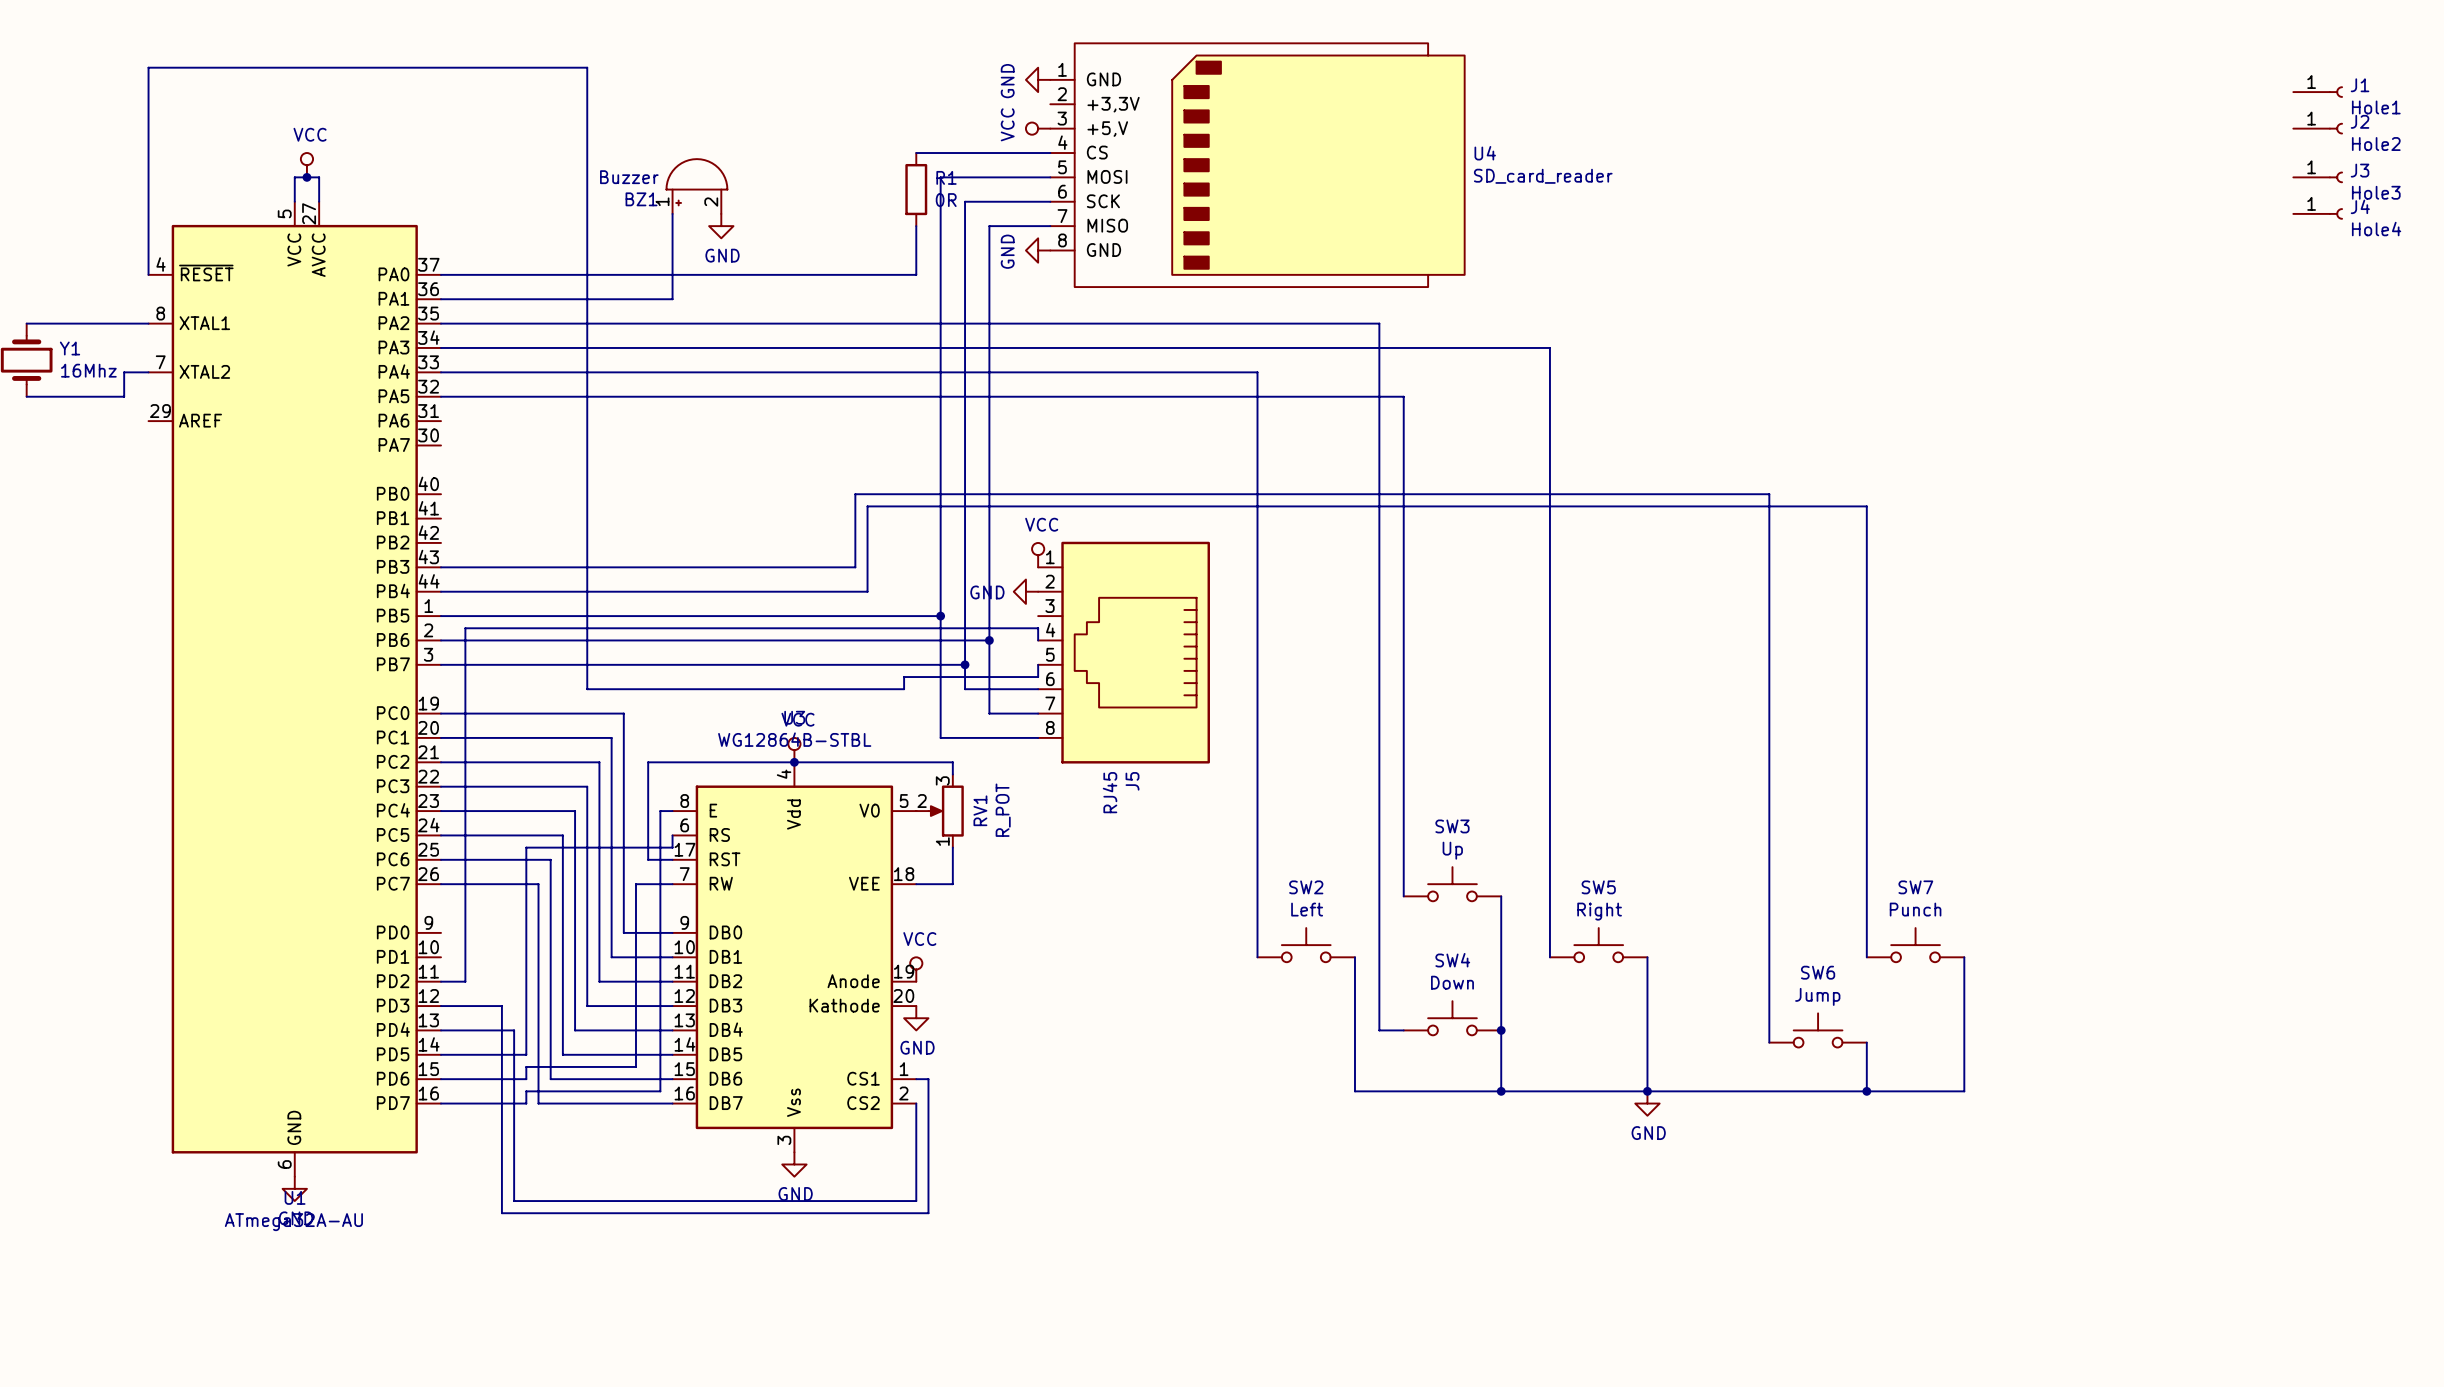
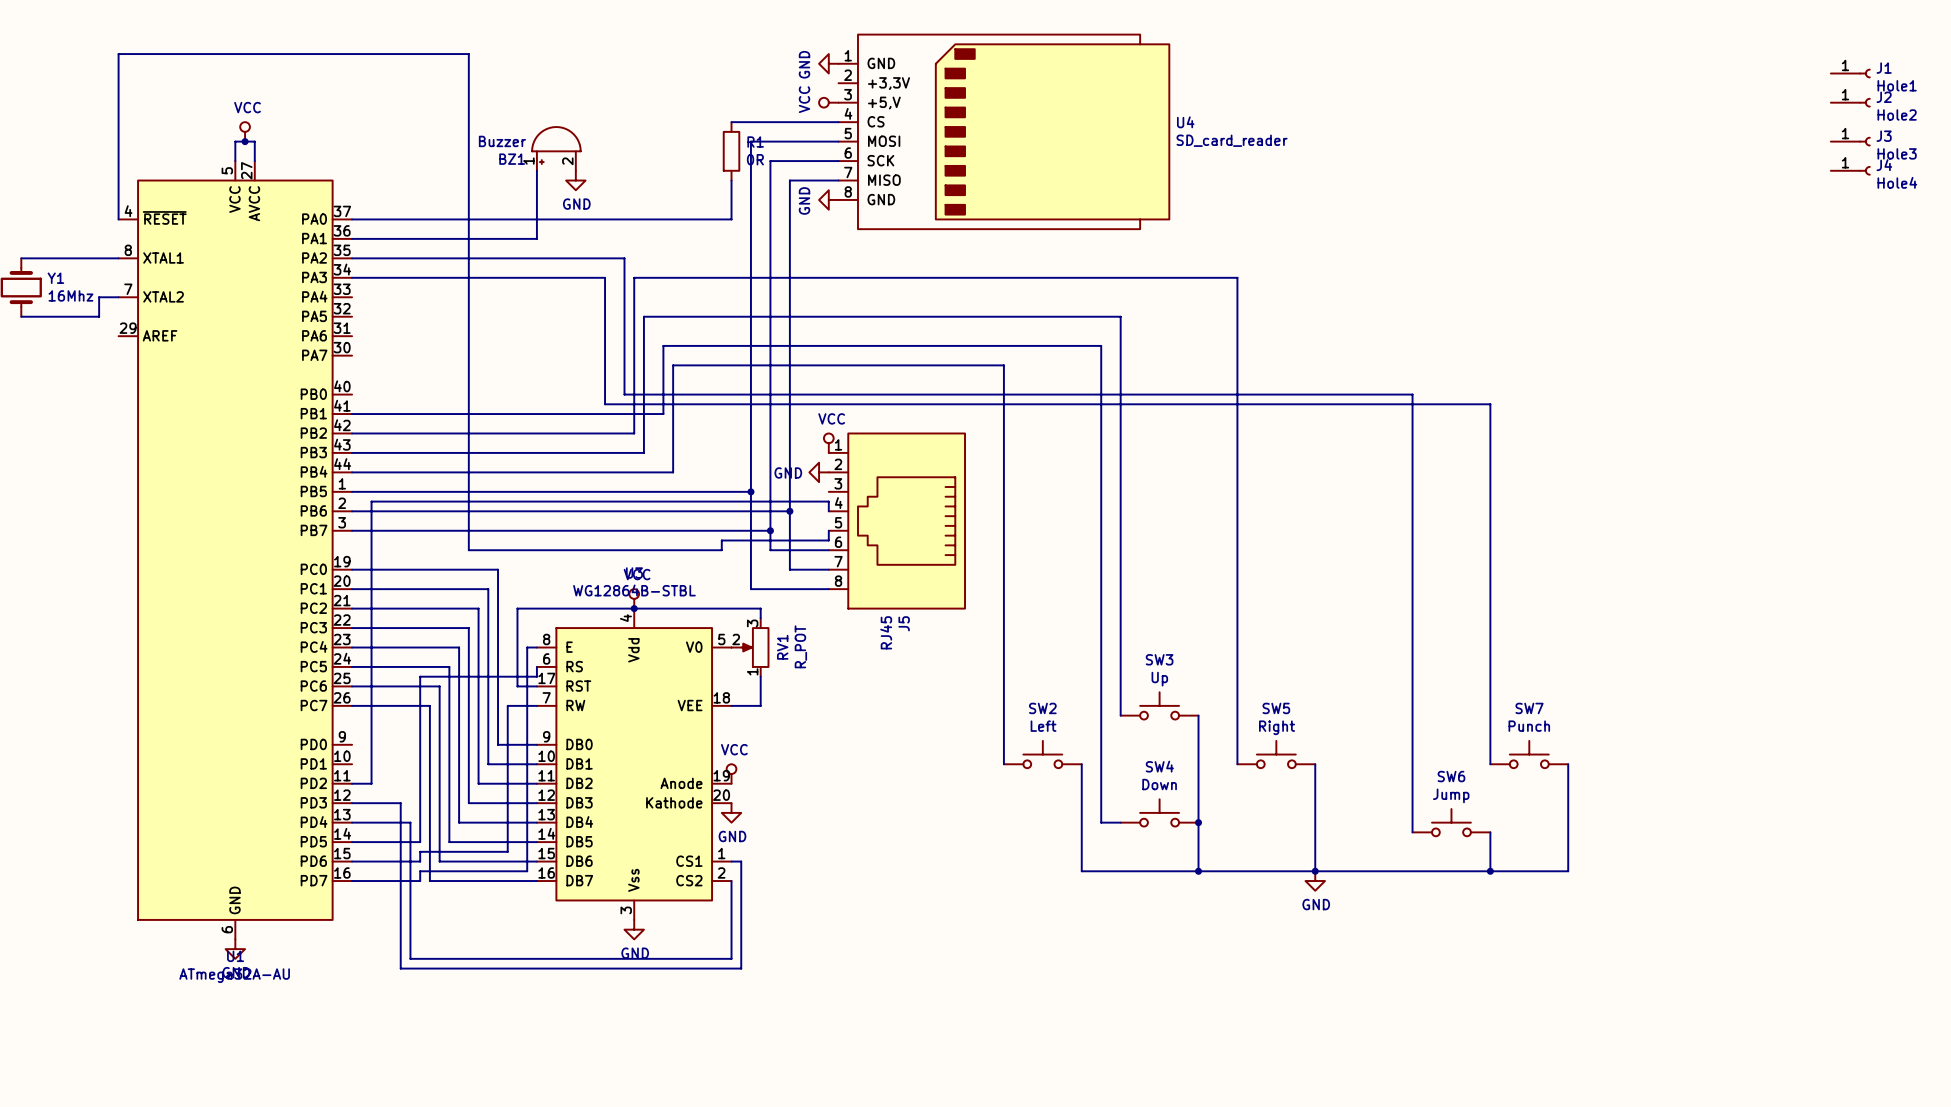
wire: (782, 323) (1379, 323) (1379, 433) -> (352, 414) (663, 414) (663, 345) (1101, 345)
wire: none -> (624, 258) (624, 394) (682, 394)
wire: (757, 347) (794, 347) -> (605, 277) (605, 404) (692, 404)
wire: none -> (634, 277) (634, 433) (352, 433)
wire: (441, 372) (1257, 372) (1257, 457) -> none
wire: (441, 396) (806, 396) -> none
wire: (855, 494) (855, 567) (806, 567) -> (643, 316) (643, 452)
wire: (867, 506) (867, 591) (843, 591) -> (1003, 365) (673, 365) (673, 472)

